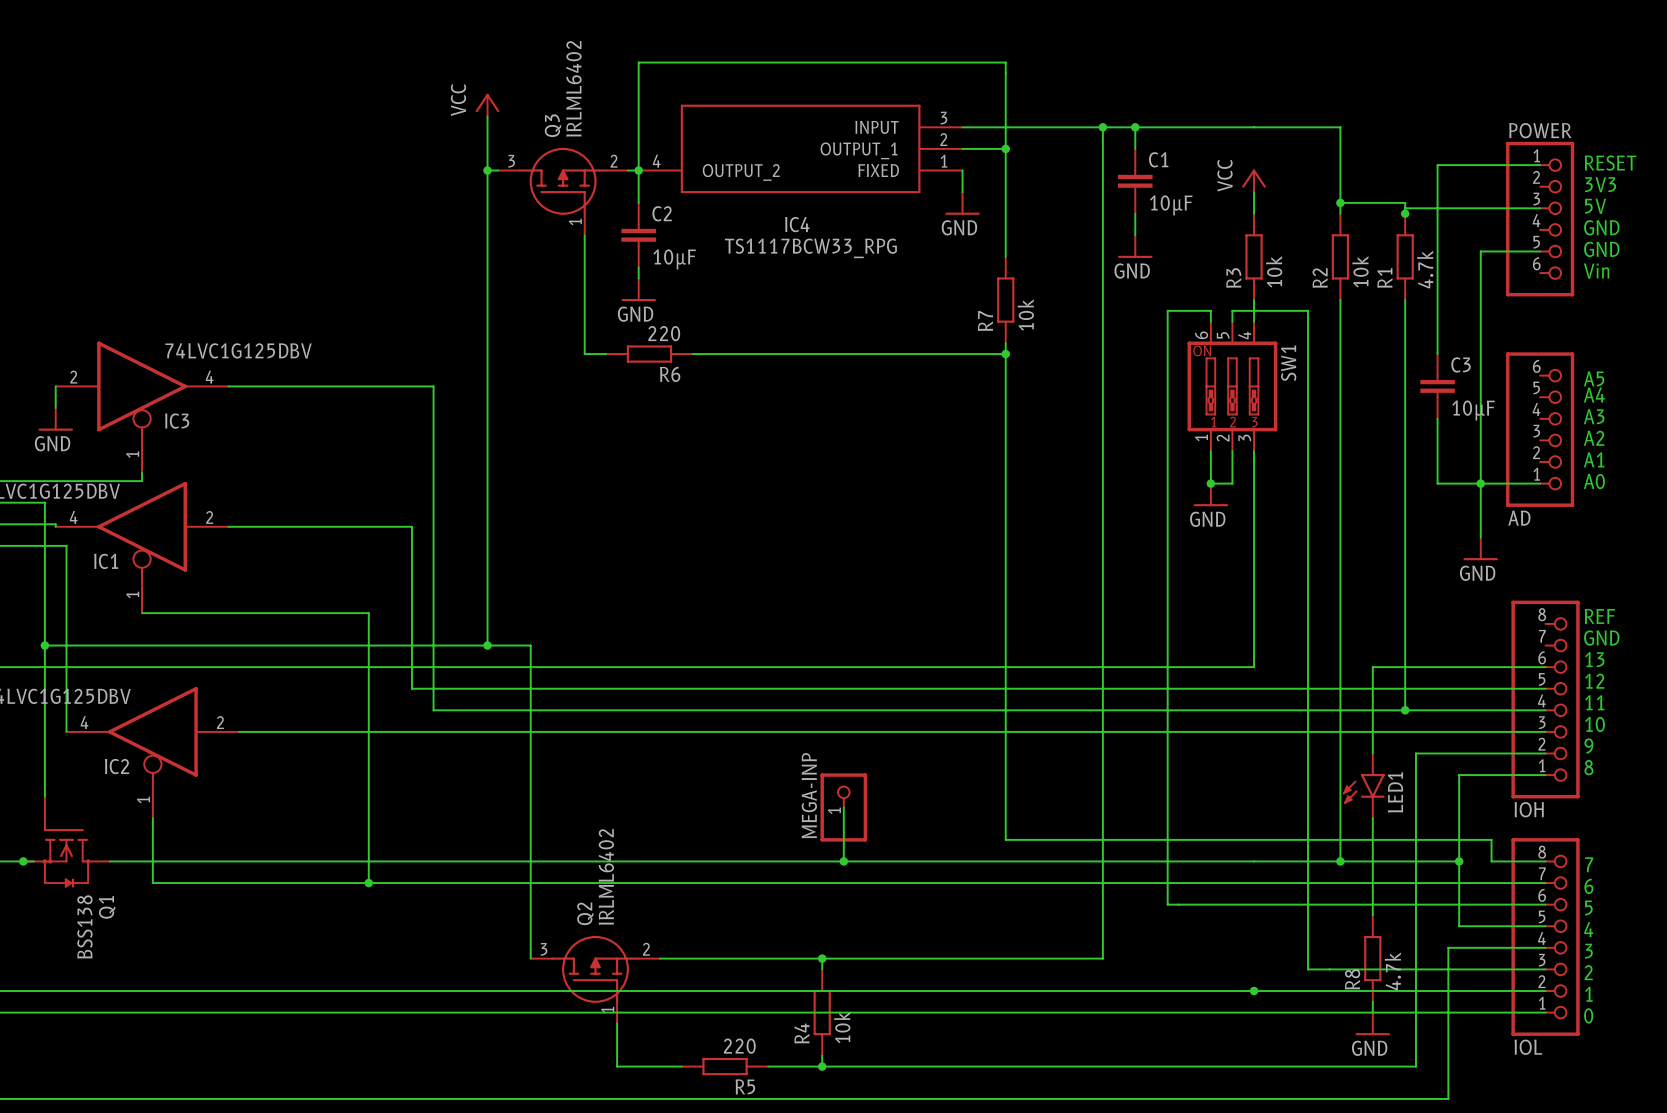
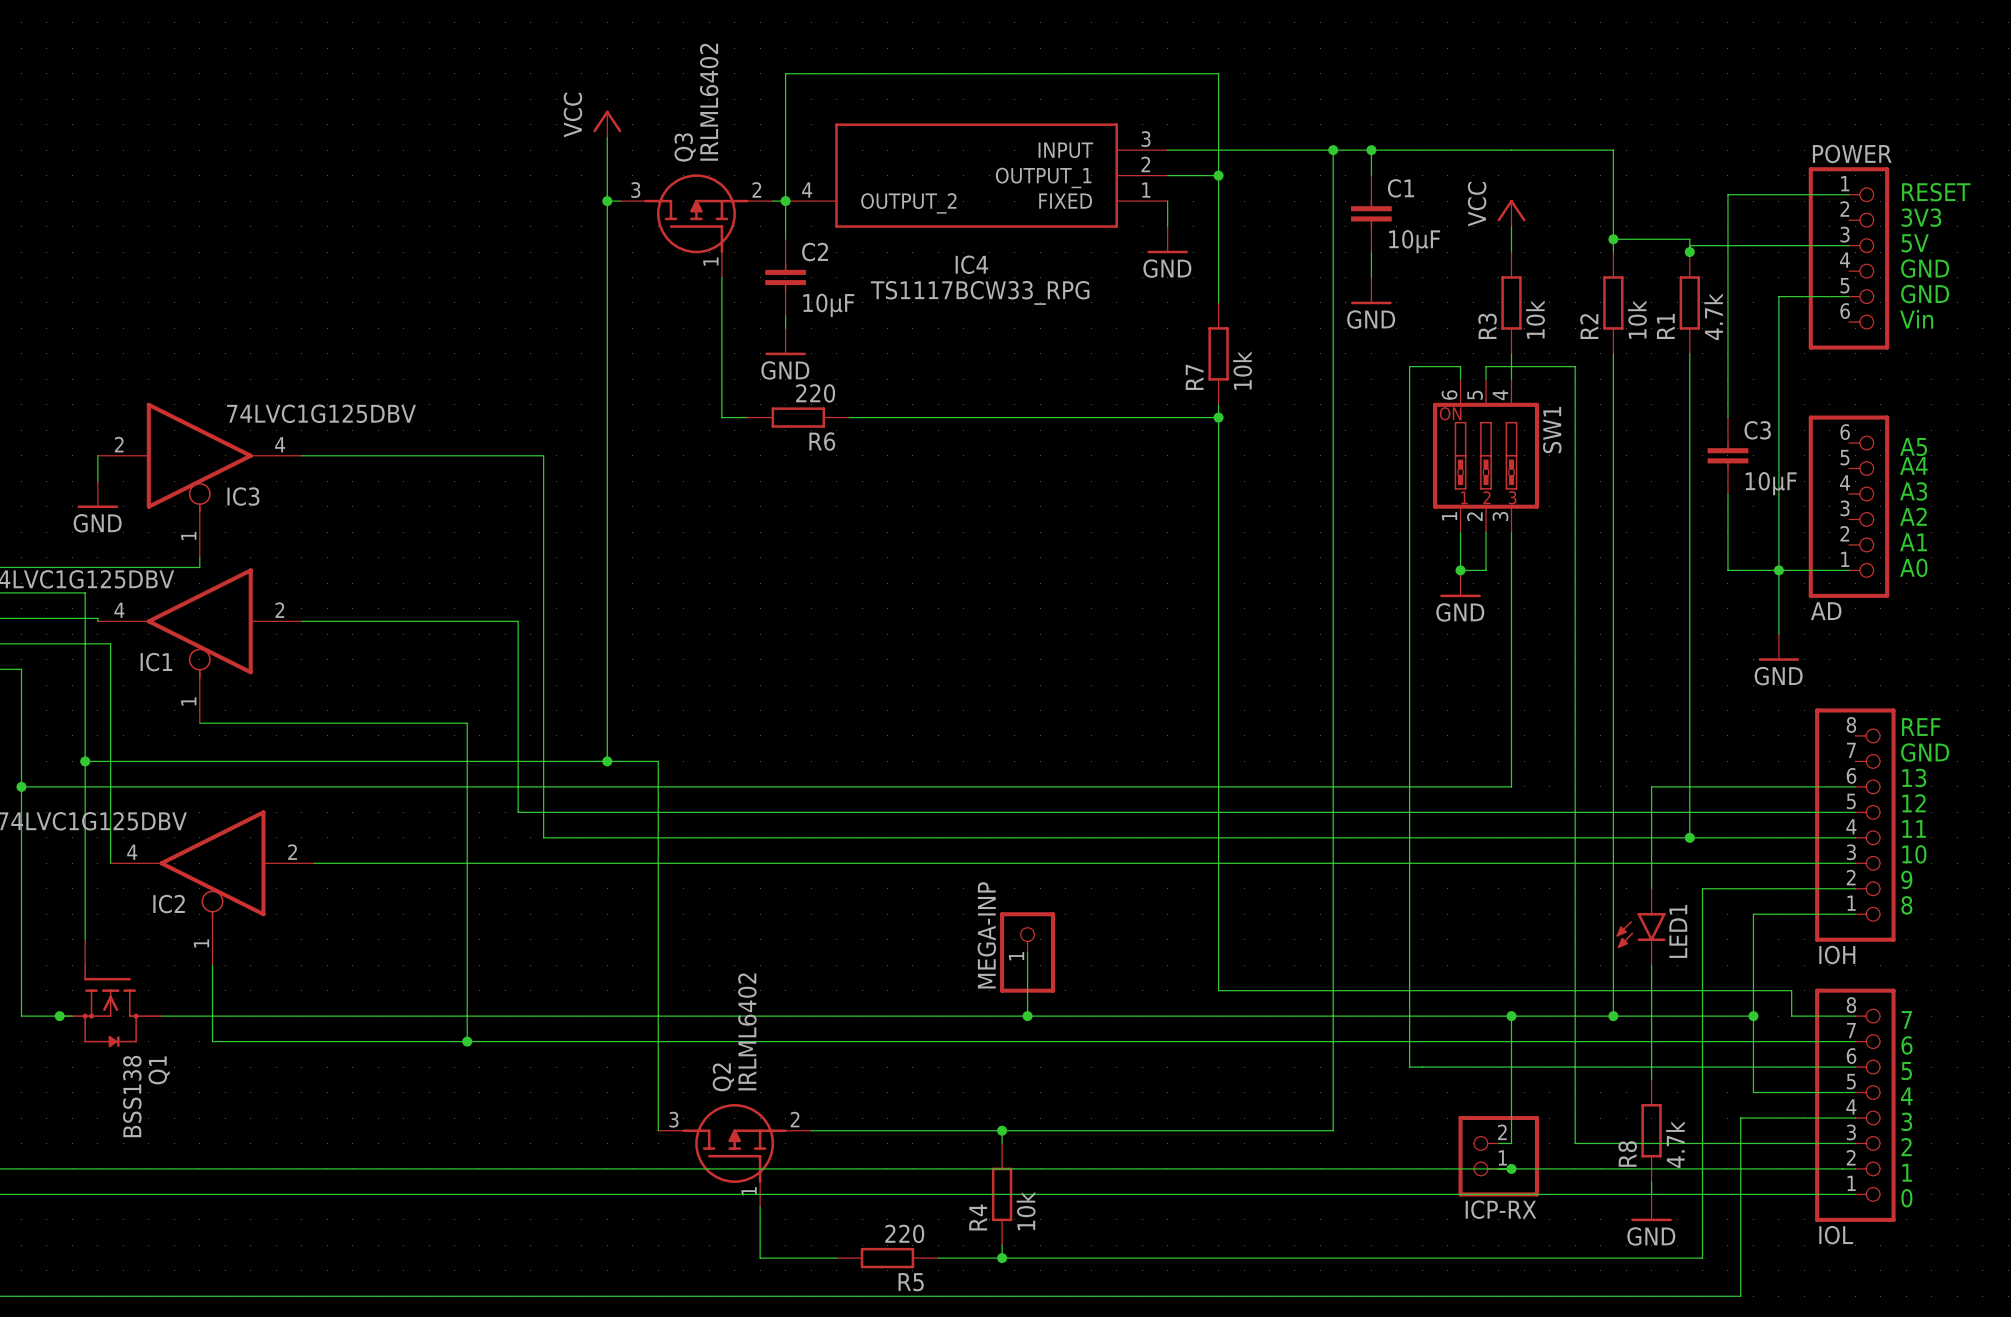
wire: none -> (1511, 1016) (1511, 1143) (1498, 1143)
junction: none -> (1511, 1016)
ICP-RX: none -> (1498, 1156)

